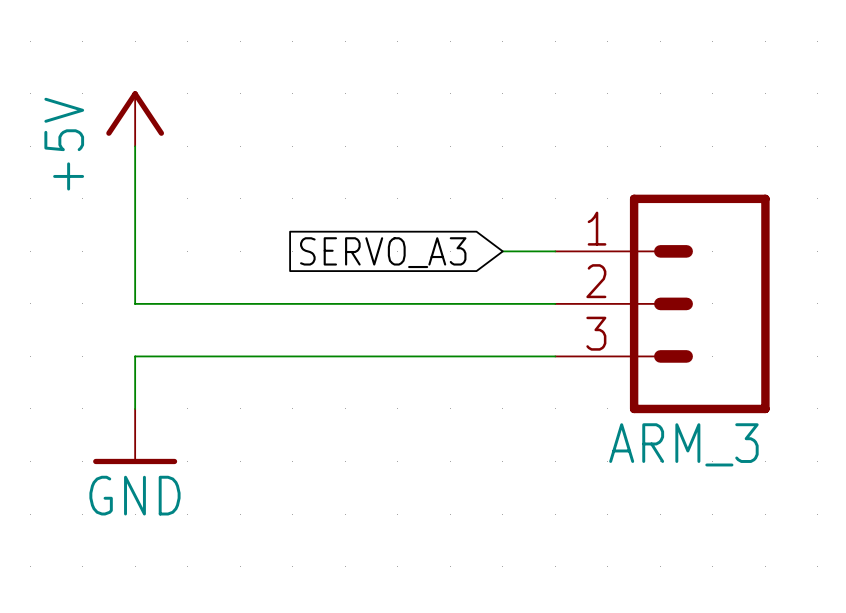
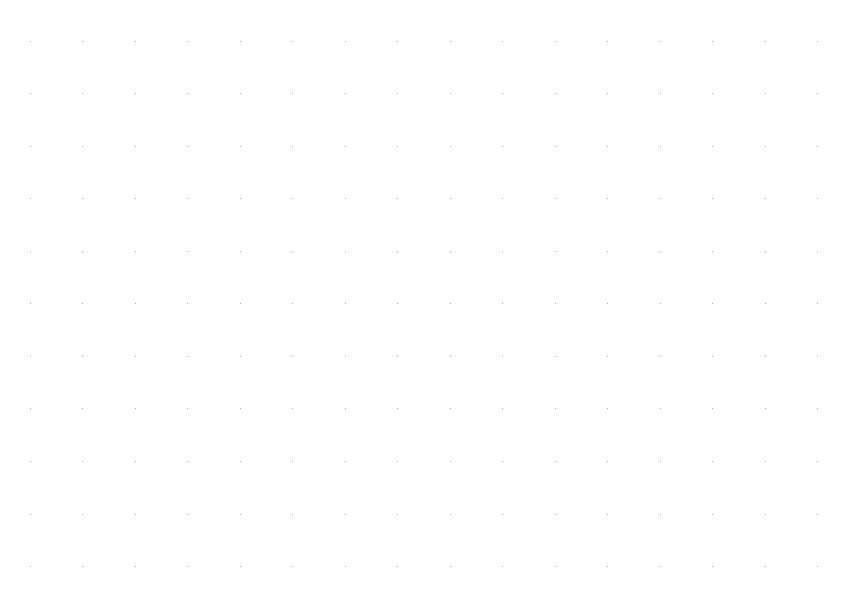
power symbol: +5V (135, 118) -> none
wire: (135, 146) (135, 303) (555, 303) -> none
wire: (502, 251) (555, 251) -> none
global label: SERVO_A3 (383, 252) -> none
ARM_3: (662, 303) -> none
wire: (555, 356) (135, 356) (135, 408) -> none
power symbol: GND (135, 436) -> none

